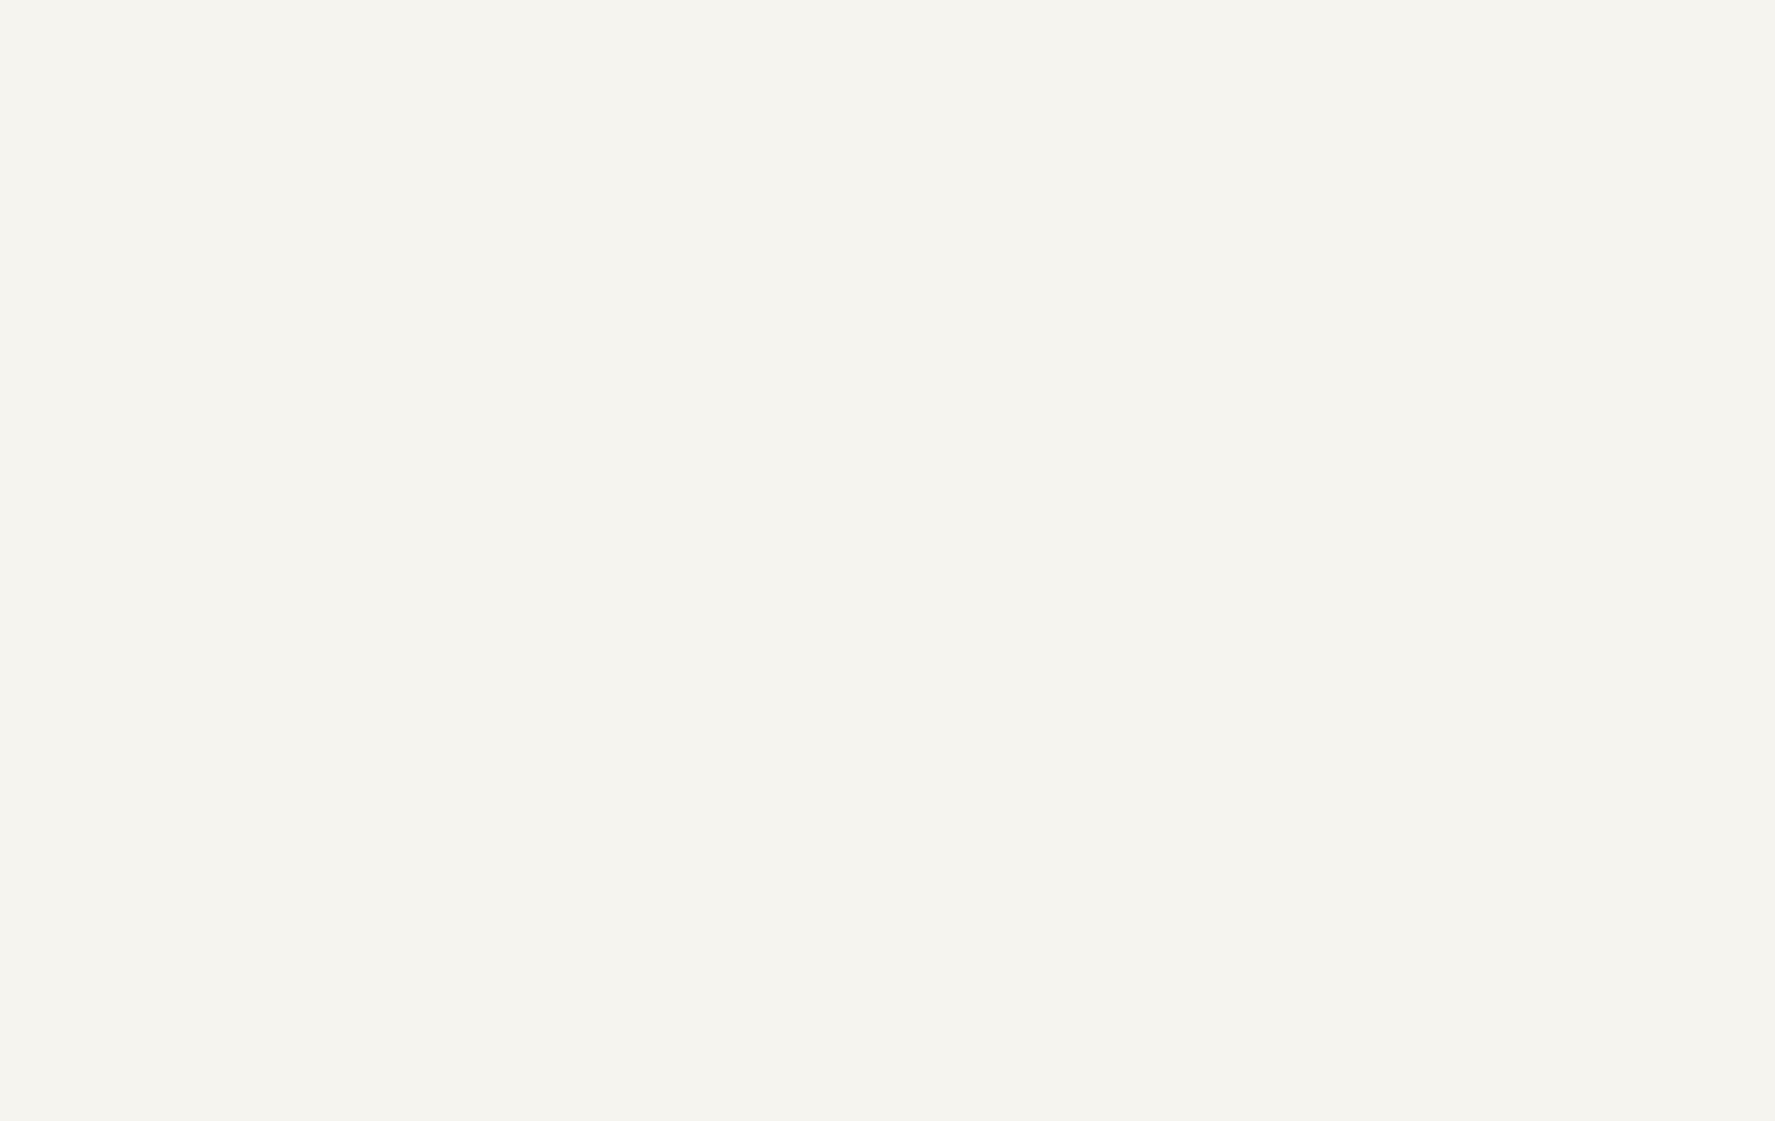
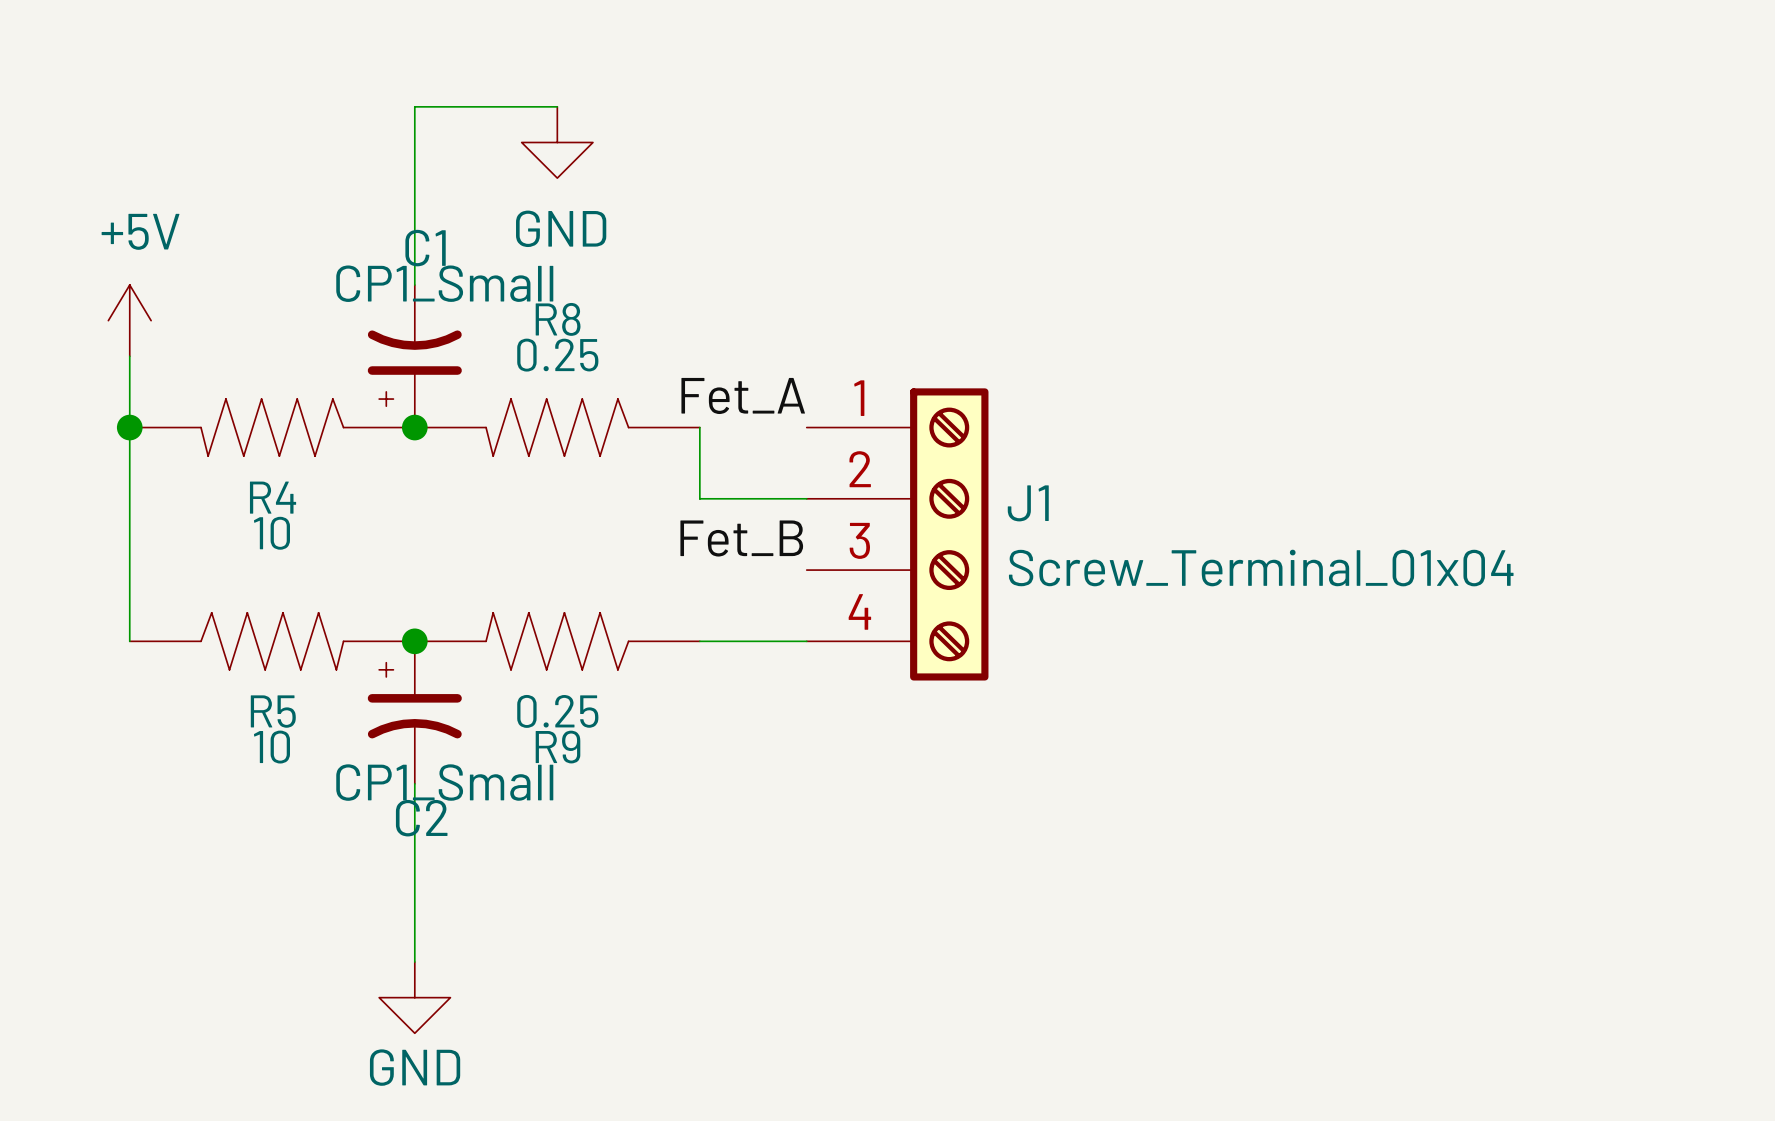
wire: none -> (557, 106) (414, 106) (414, 285)
power symbol: none -> GND (557, 142)
power symbol: none -> +5V (129, 320)
wire: none -> (129, 356) (129, 641)
C1: none -> CP1_Small (414, 356)
label: none -> Fet_A (743, 395)
junction: none -> (129, 427)
R4: none -> 10 (272, 427)
junction: none -> (414, 427)
R8: none -> 0.25 (557, 427)
wire: none -> (699, 427) (699, 498) (806, 498)
J1: none -> Screw_Terminal_01x04 (897, 534)
label: none -> Fet_B (741, 538)
R5: none -> 10 (272, 641)
junction: none -> (414, 641)
R9: none -> 0.25 (557, 641)
wire: none -> (699, 641) (806, 641)
C2: none -> CP1_Small (414, 712)
wire: none -> (414, 783) (414, 962)
power symbol: none -> GND (414, 997)

